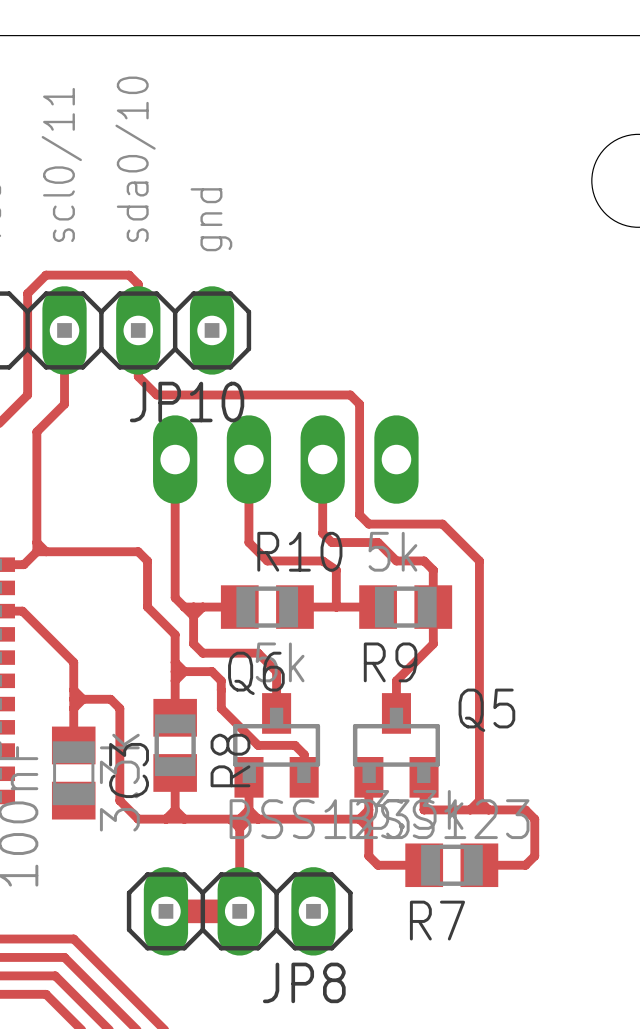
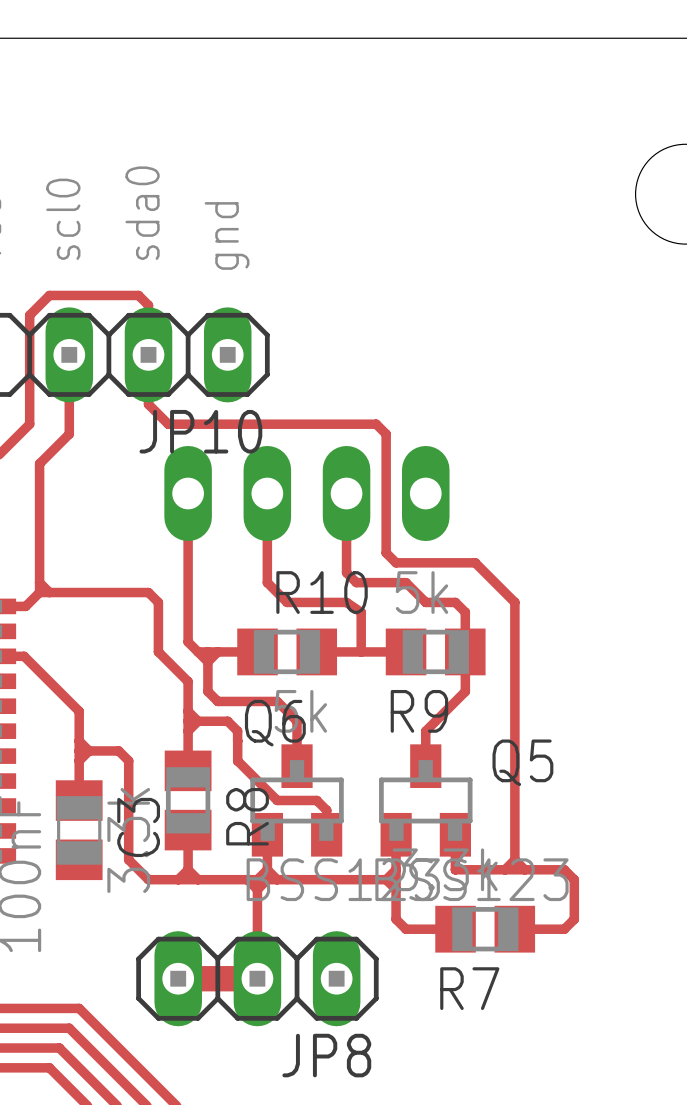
text: sda0/10 (135, 159) -> sda0 (142, 213)
text: scl0/11 (61, 164) -> scl0 (63, 219)

